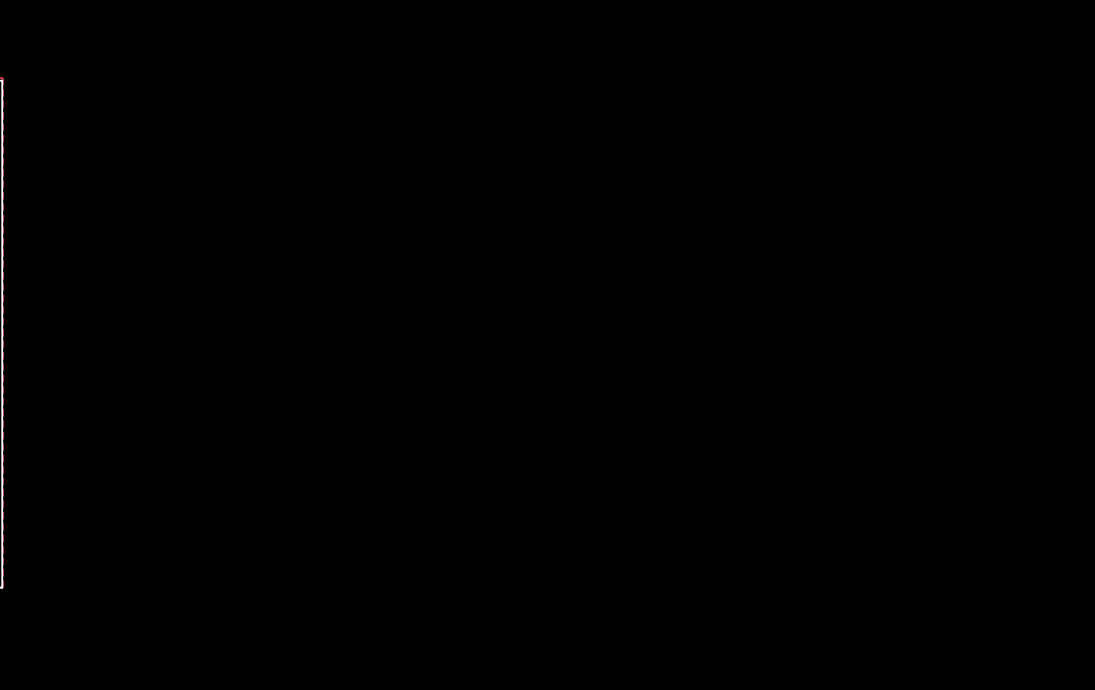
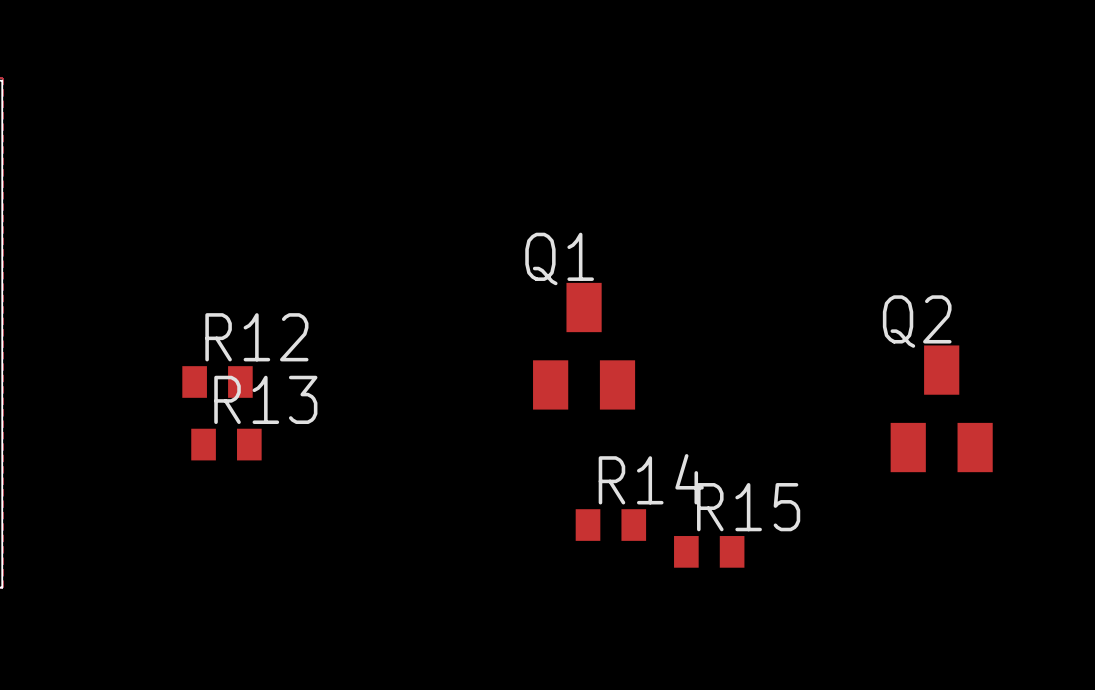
Q1: none -> (584, 346)
R12: none -> (217, 381)
Q2: none -> (941, 408)
R13: none -> (226, 444)
R14: none -> (610, 525)
R15: none -> (709, 551)

